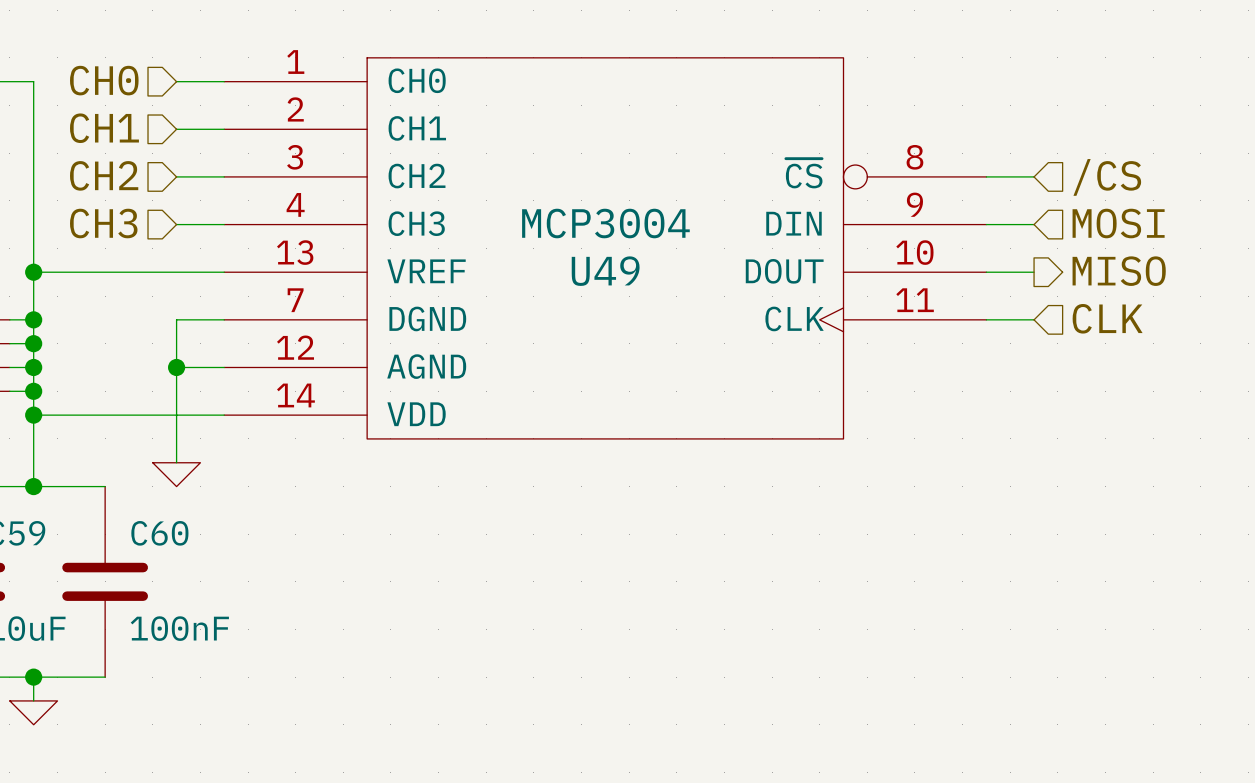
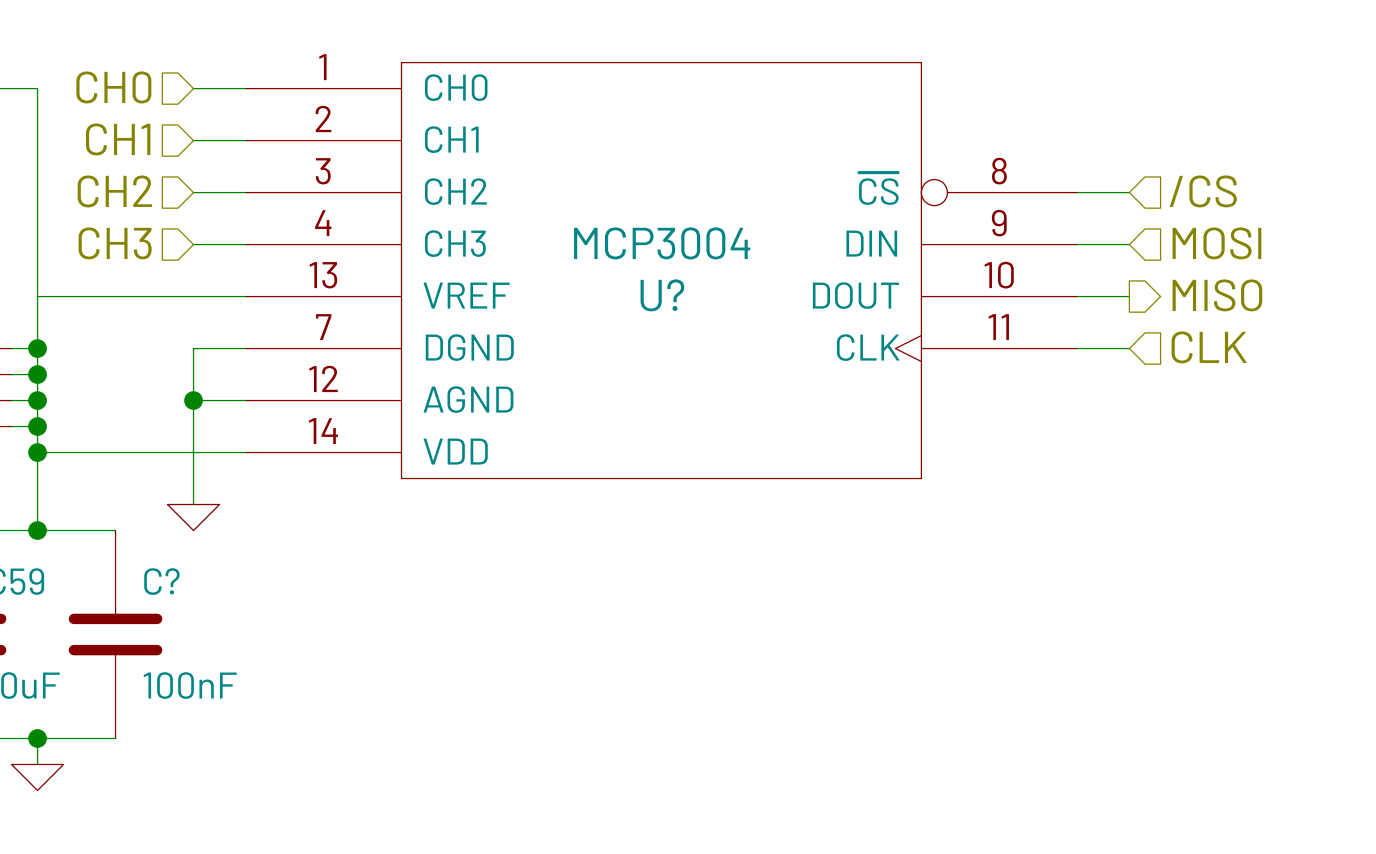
U49 name: U49 (605, 271) -> U? (662, 295)
junction: (33, 272) -> none
C60 name: C60 (159, 533) -> C? (161, 581)

